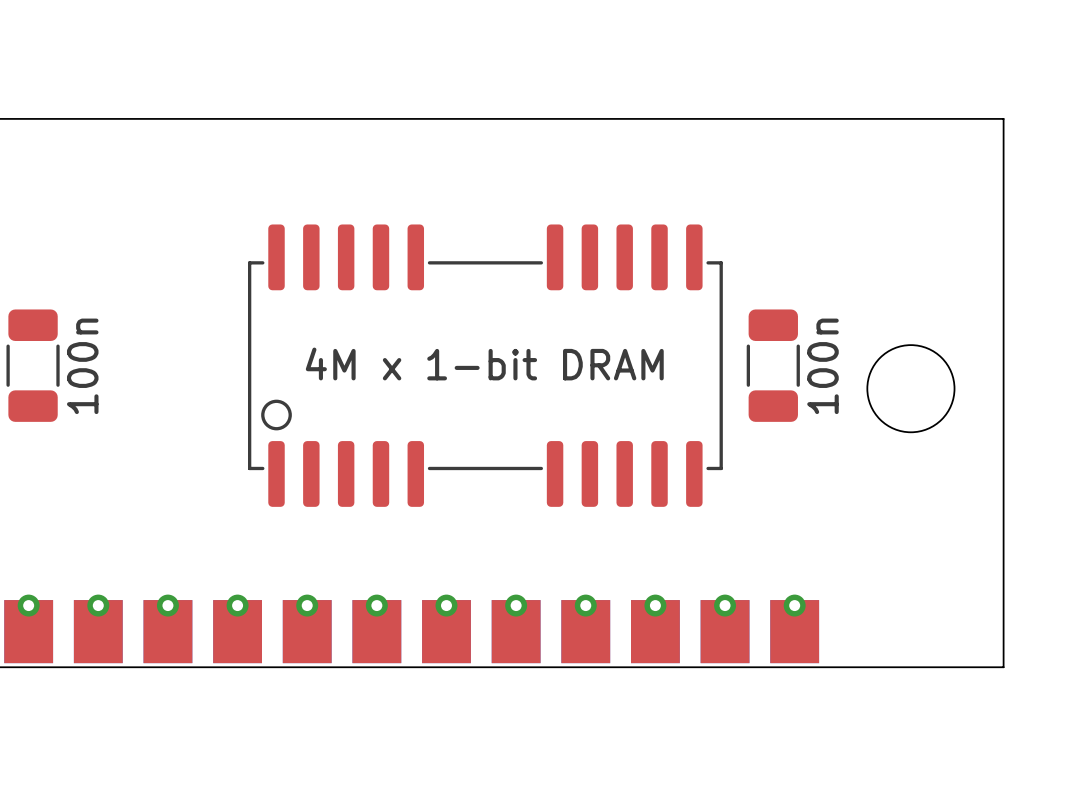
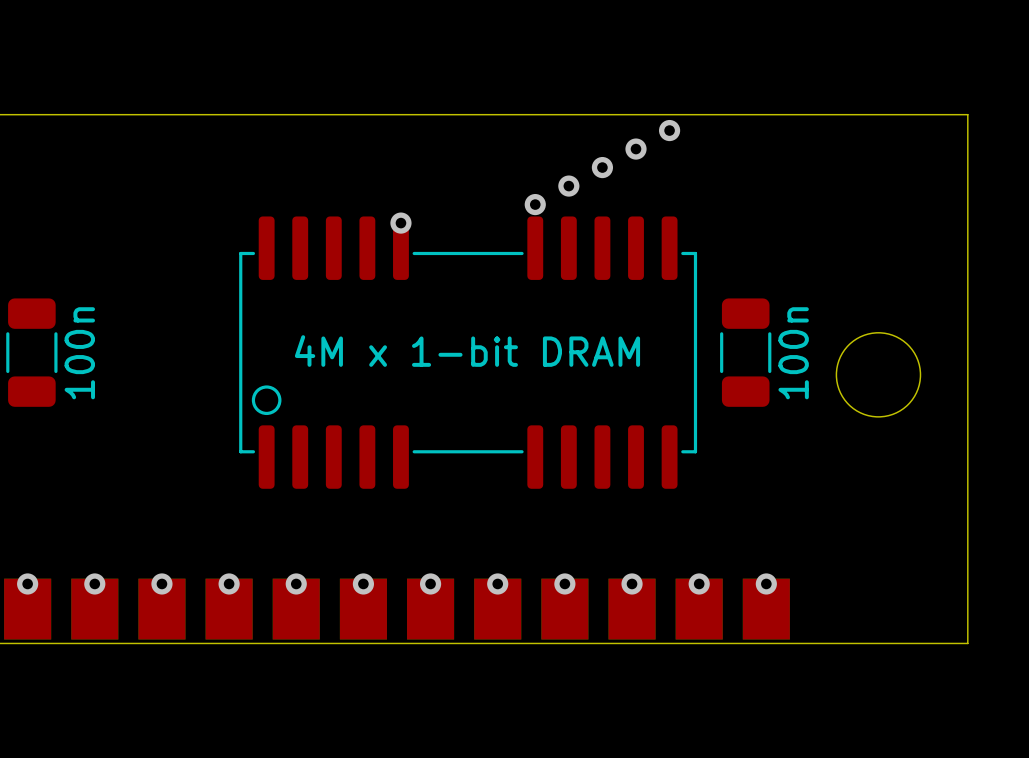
via: none -> (669, 130)
via: none -> (636, 149)
via: none -> (602, 167)
via: none -> (568, 186)
via: none -> (535, 204)
via: none -> (400, 223)

